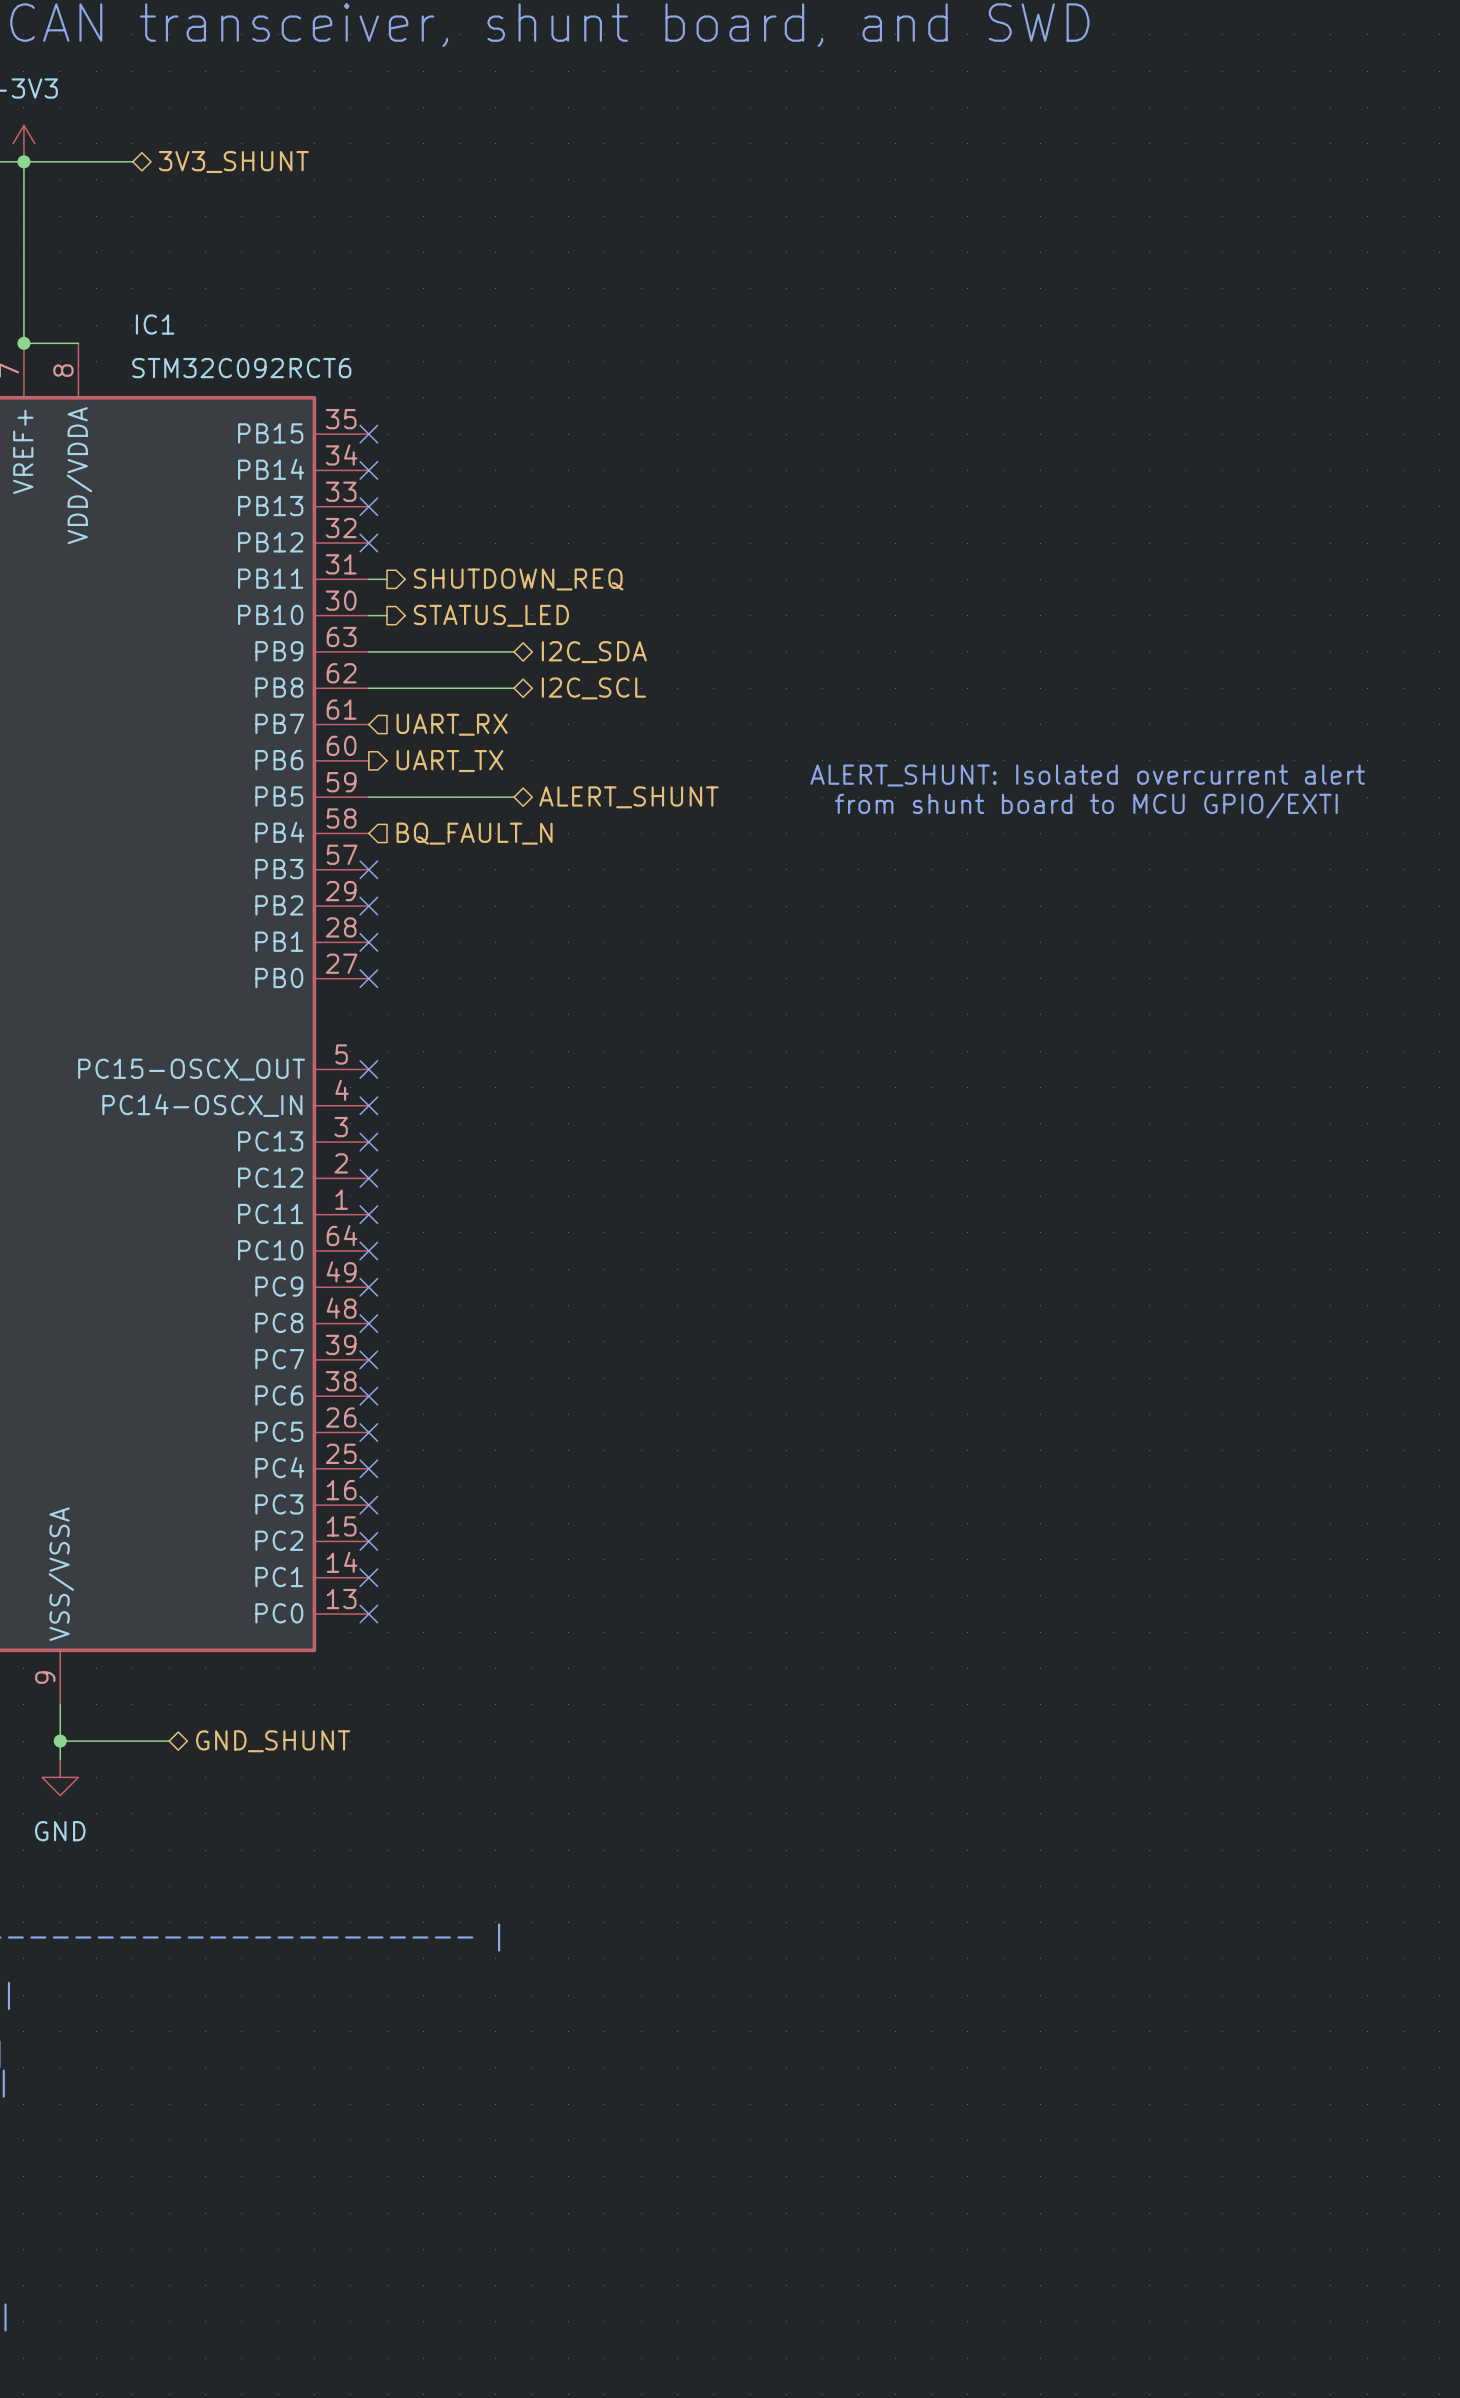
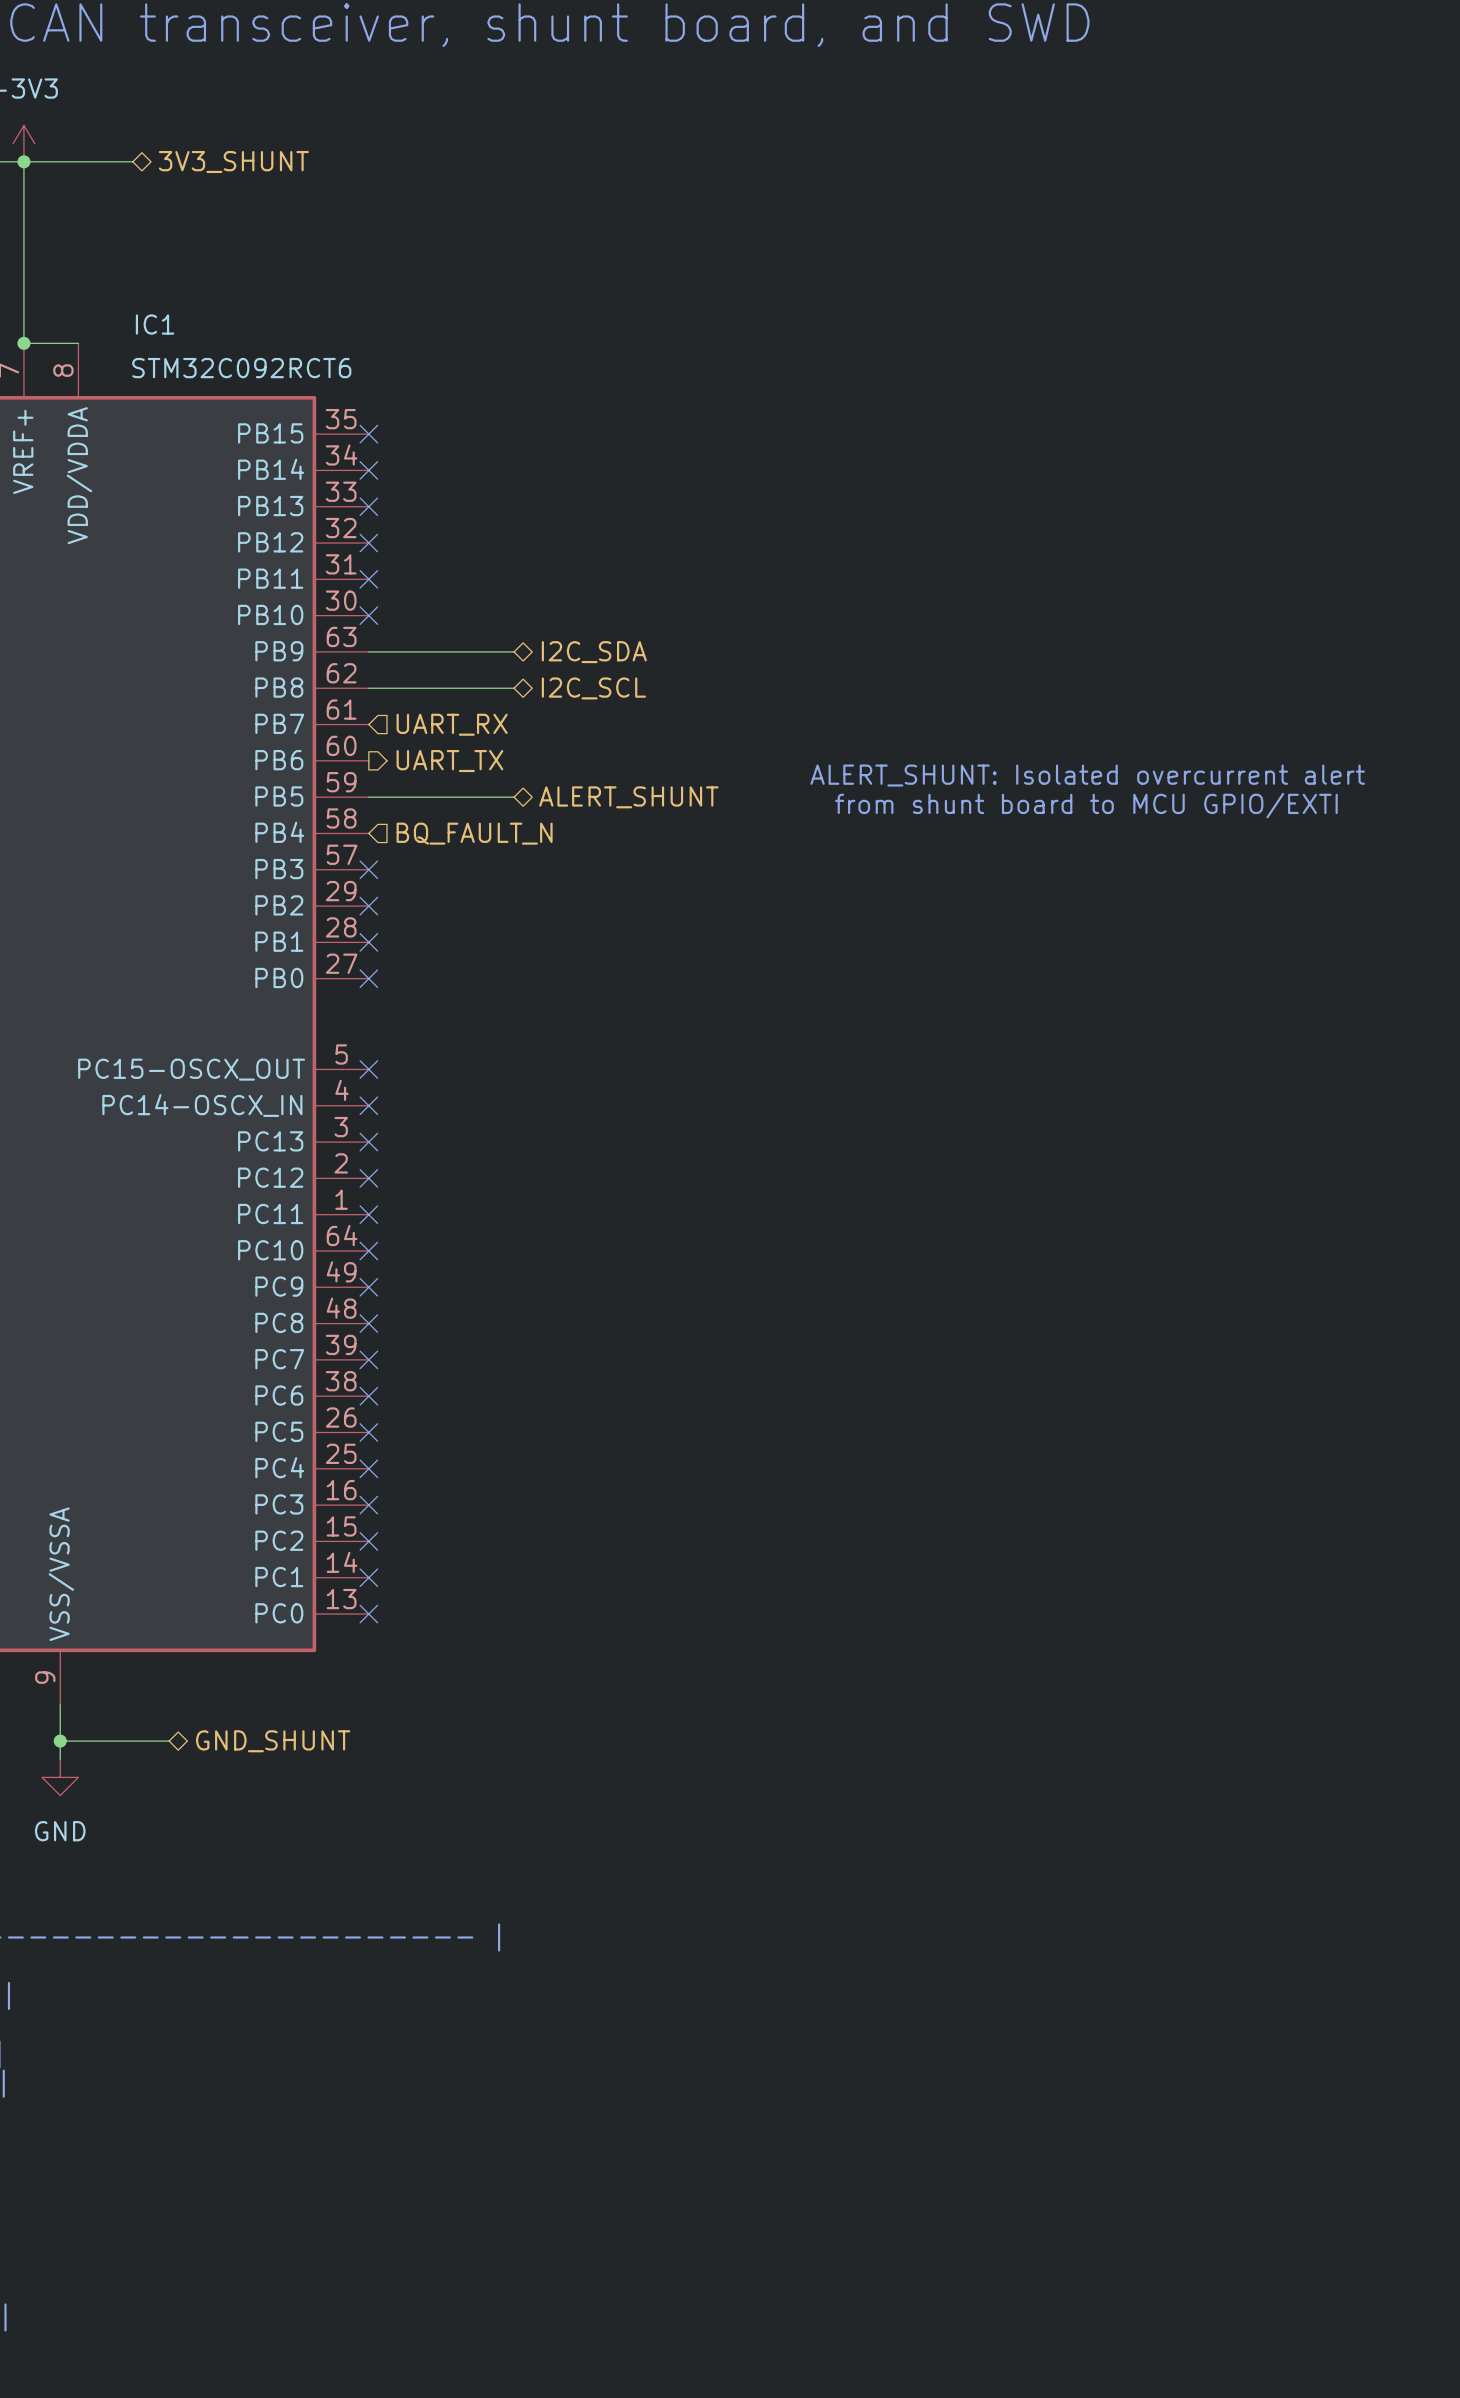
wire: (368, 579) (387, 579) -> none
no-connect mark: none -> (368, 579)
hierarchical label: SHUTDOWN_REQ (518, 579) -> none
wire: (368, 615) (387, 615) -> none
no-connect mark: none -> (368, 615)
hierarchical label: STATUS_LED (491, 615) -> none

